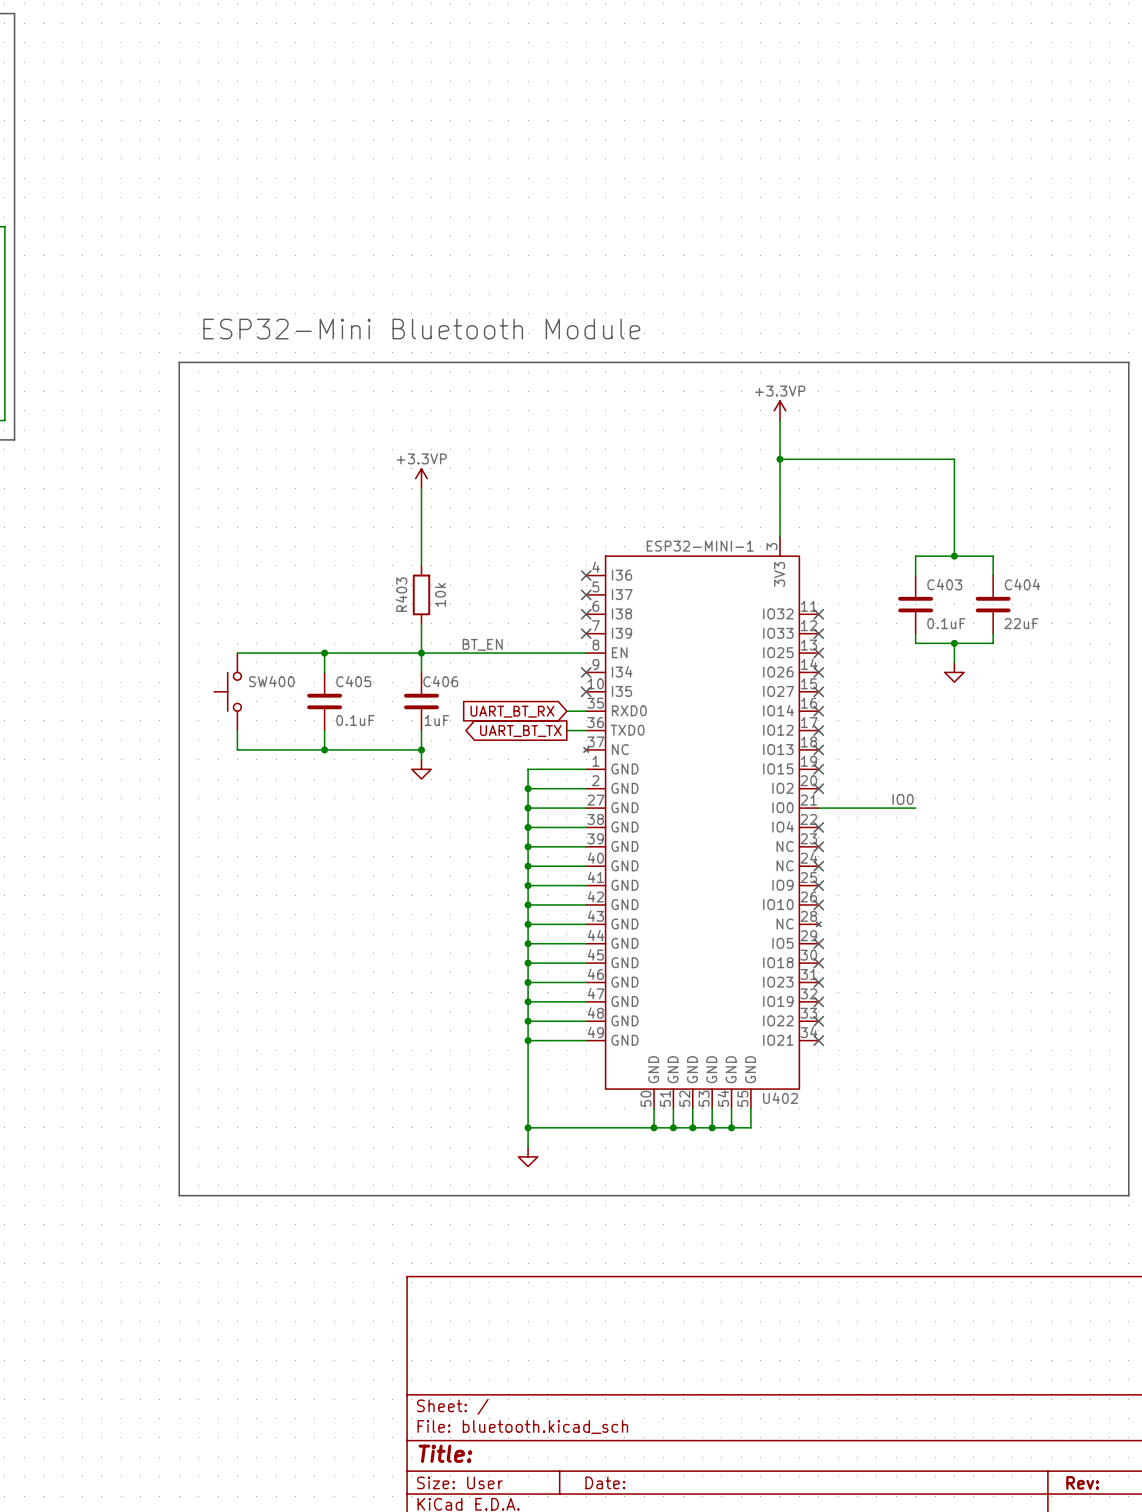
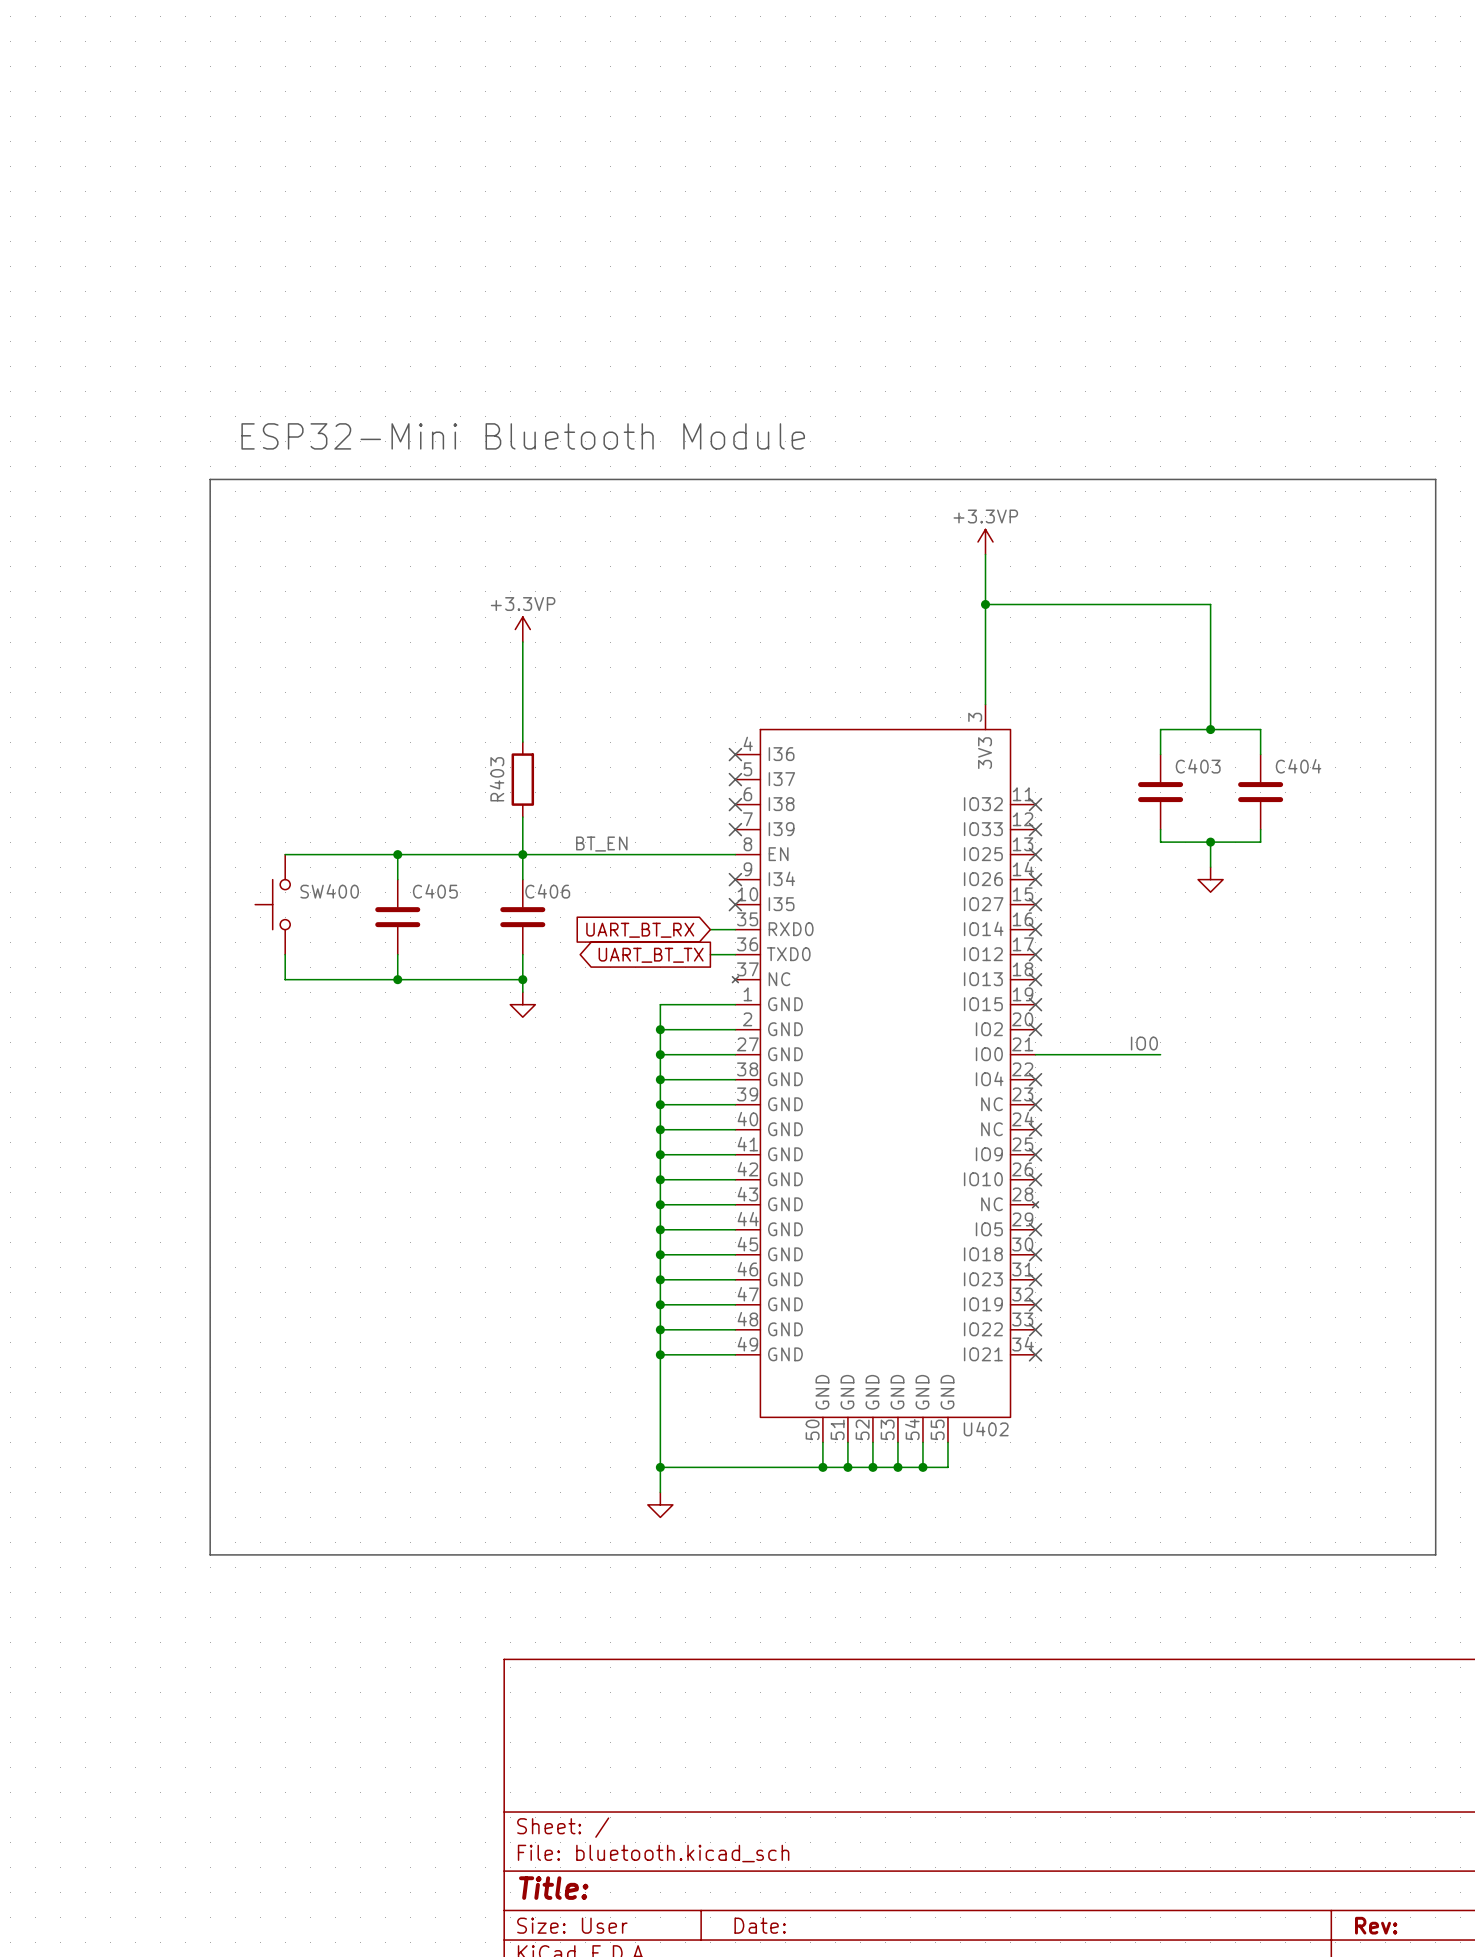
U402 value: ESP32-MINI-1 (700, 546) -> none
R403 value: 10k (440, 594) -> none
C403 value: 0.1uF (946, 623) -> none
C404 value: 22uF (1021, 623) -> none
C405 value: 0.1uF (355, 720) -> none
C406 value: 1uF (436, 720) -> none

